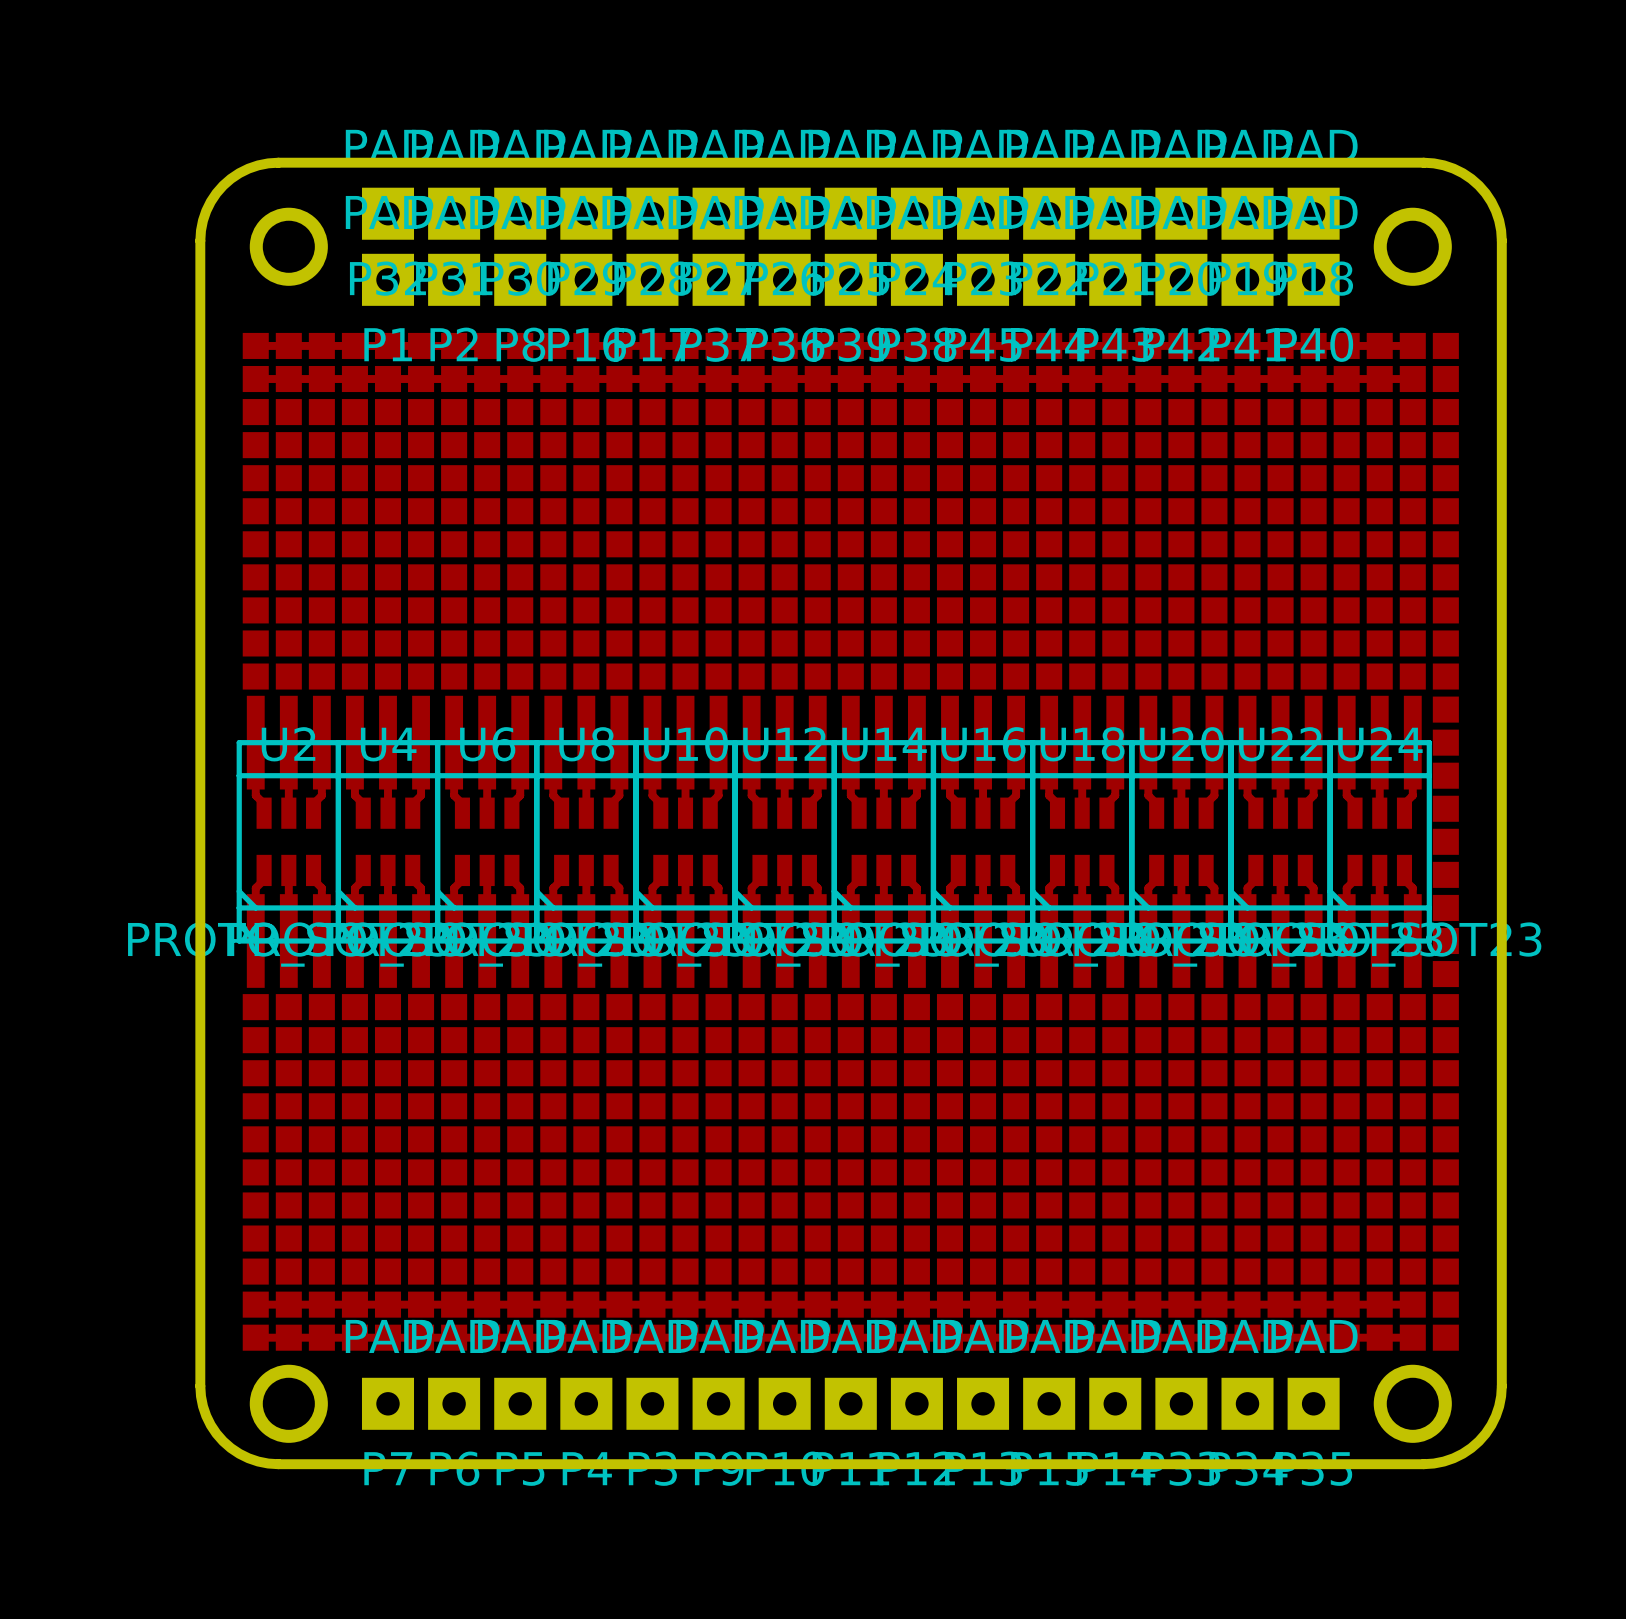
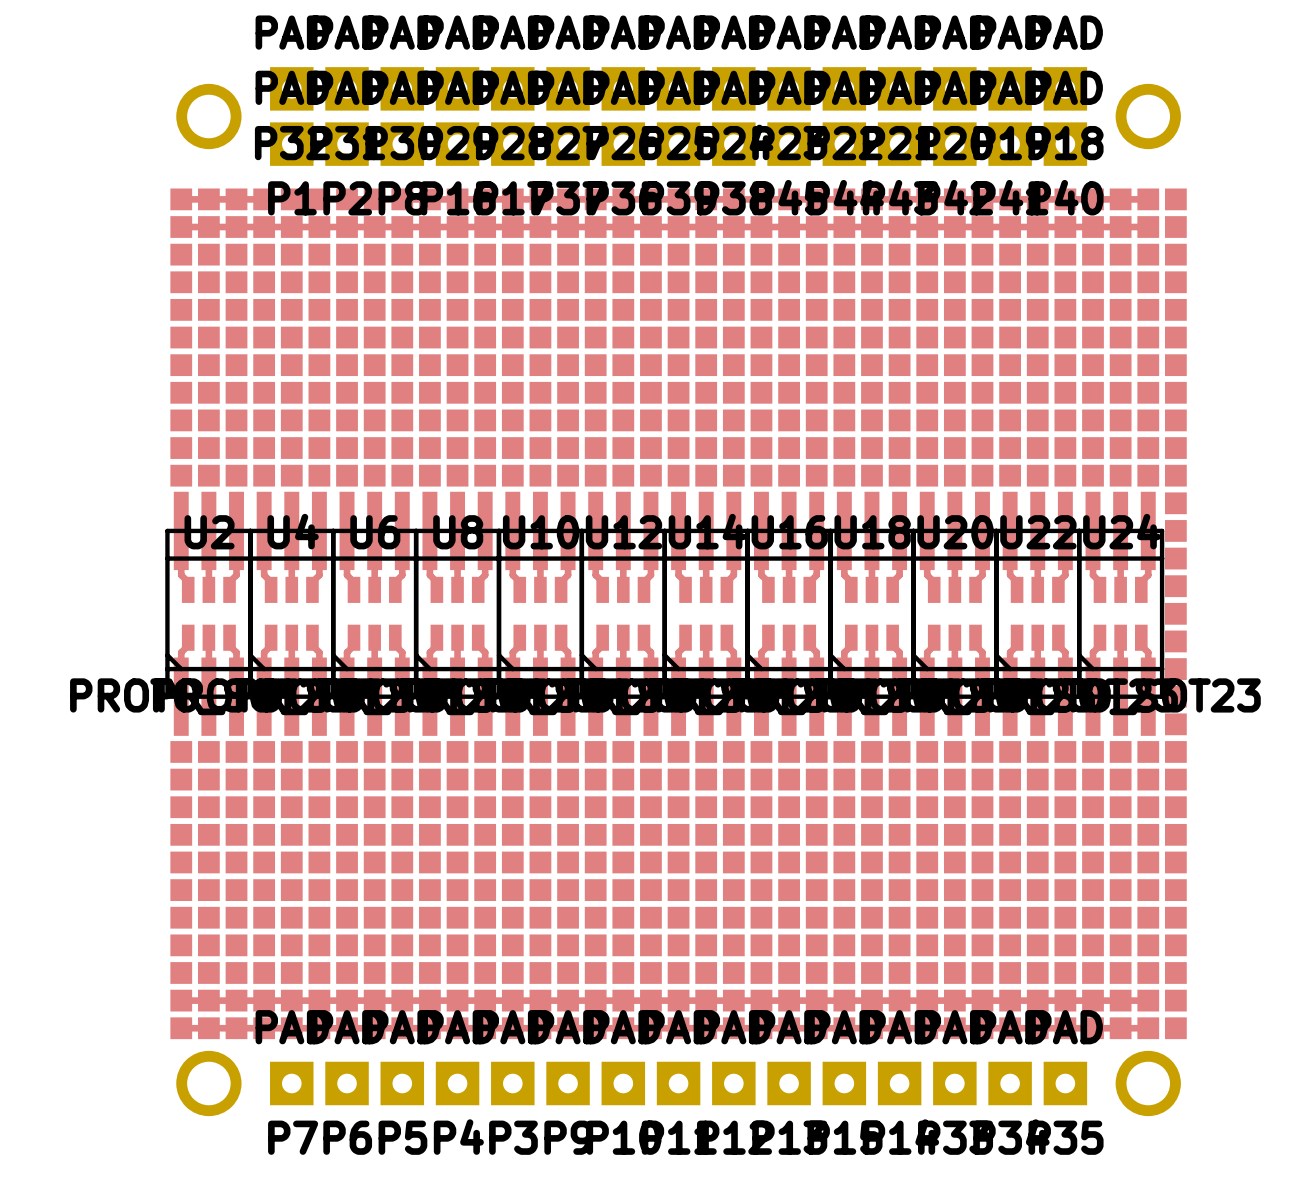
board edge: (278, 162) (1423, 162) (1453, 168) (1478, 185) (1495, 210) (1501, 240) (1501, 1386) (1495, 1415) (1478, 1441) (1453, 1458) (1423, 1464) (278, 1464) (248, 1458) (223, 1441) (206, 1415) (200, 1386) (200, 240) (206, 210) (223, 185) (248, 168) (278, 162) -> none

